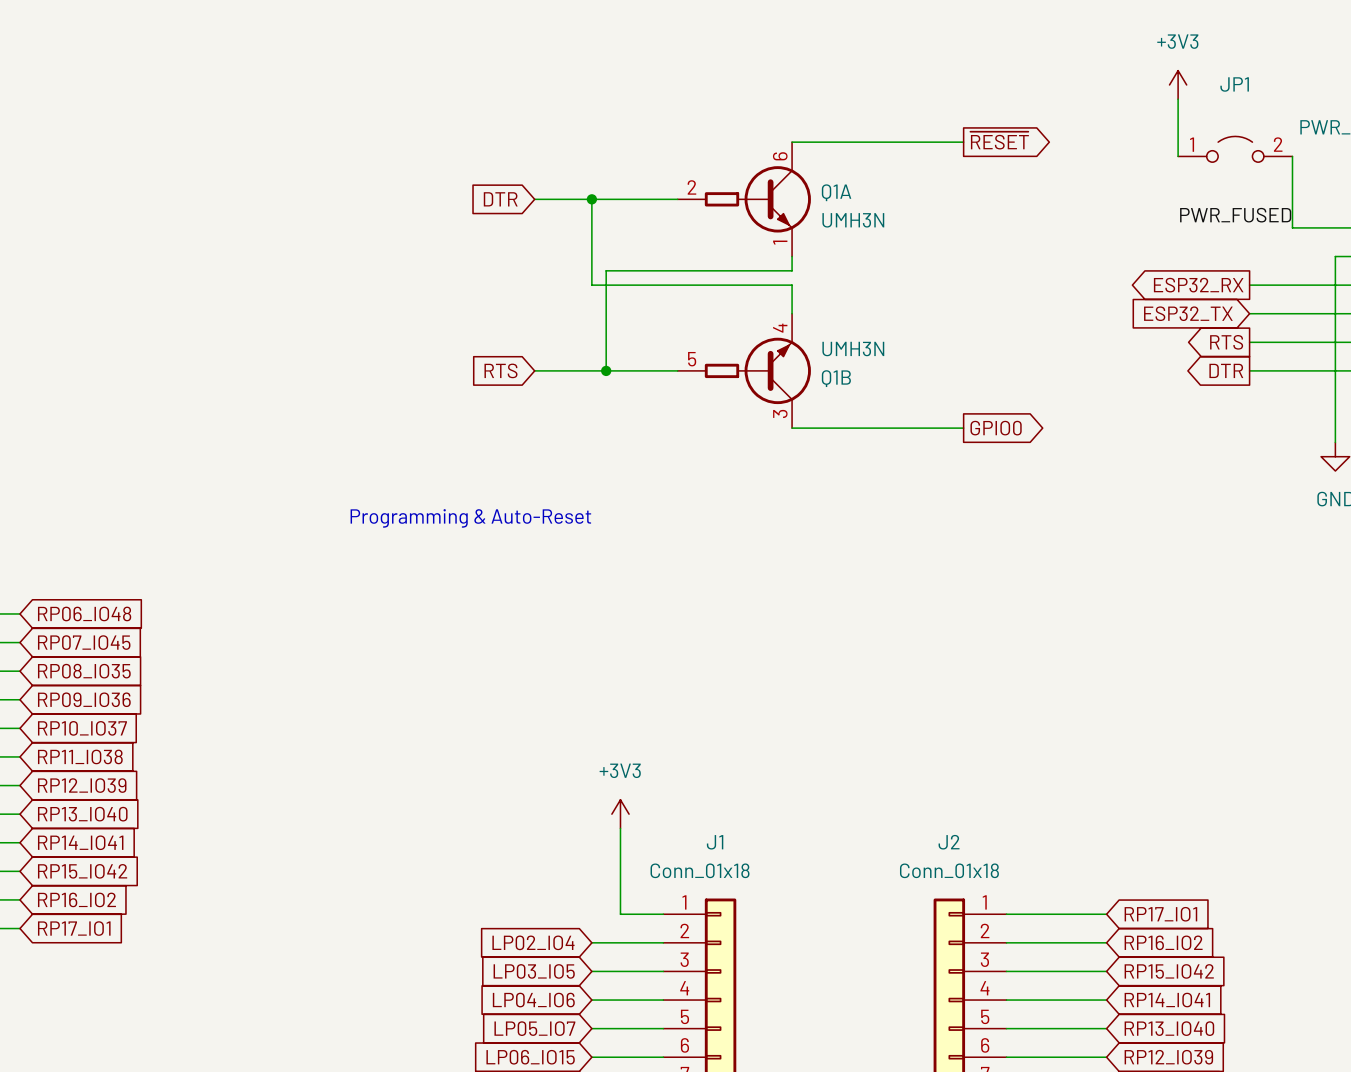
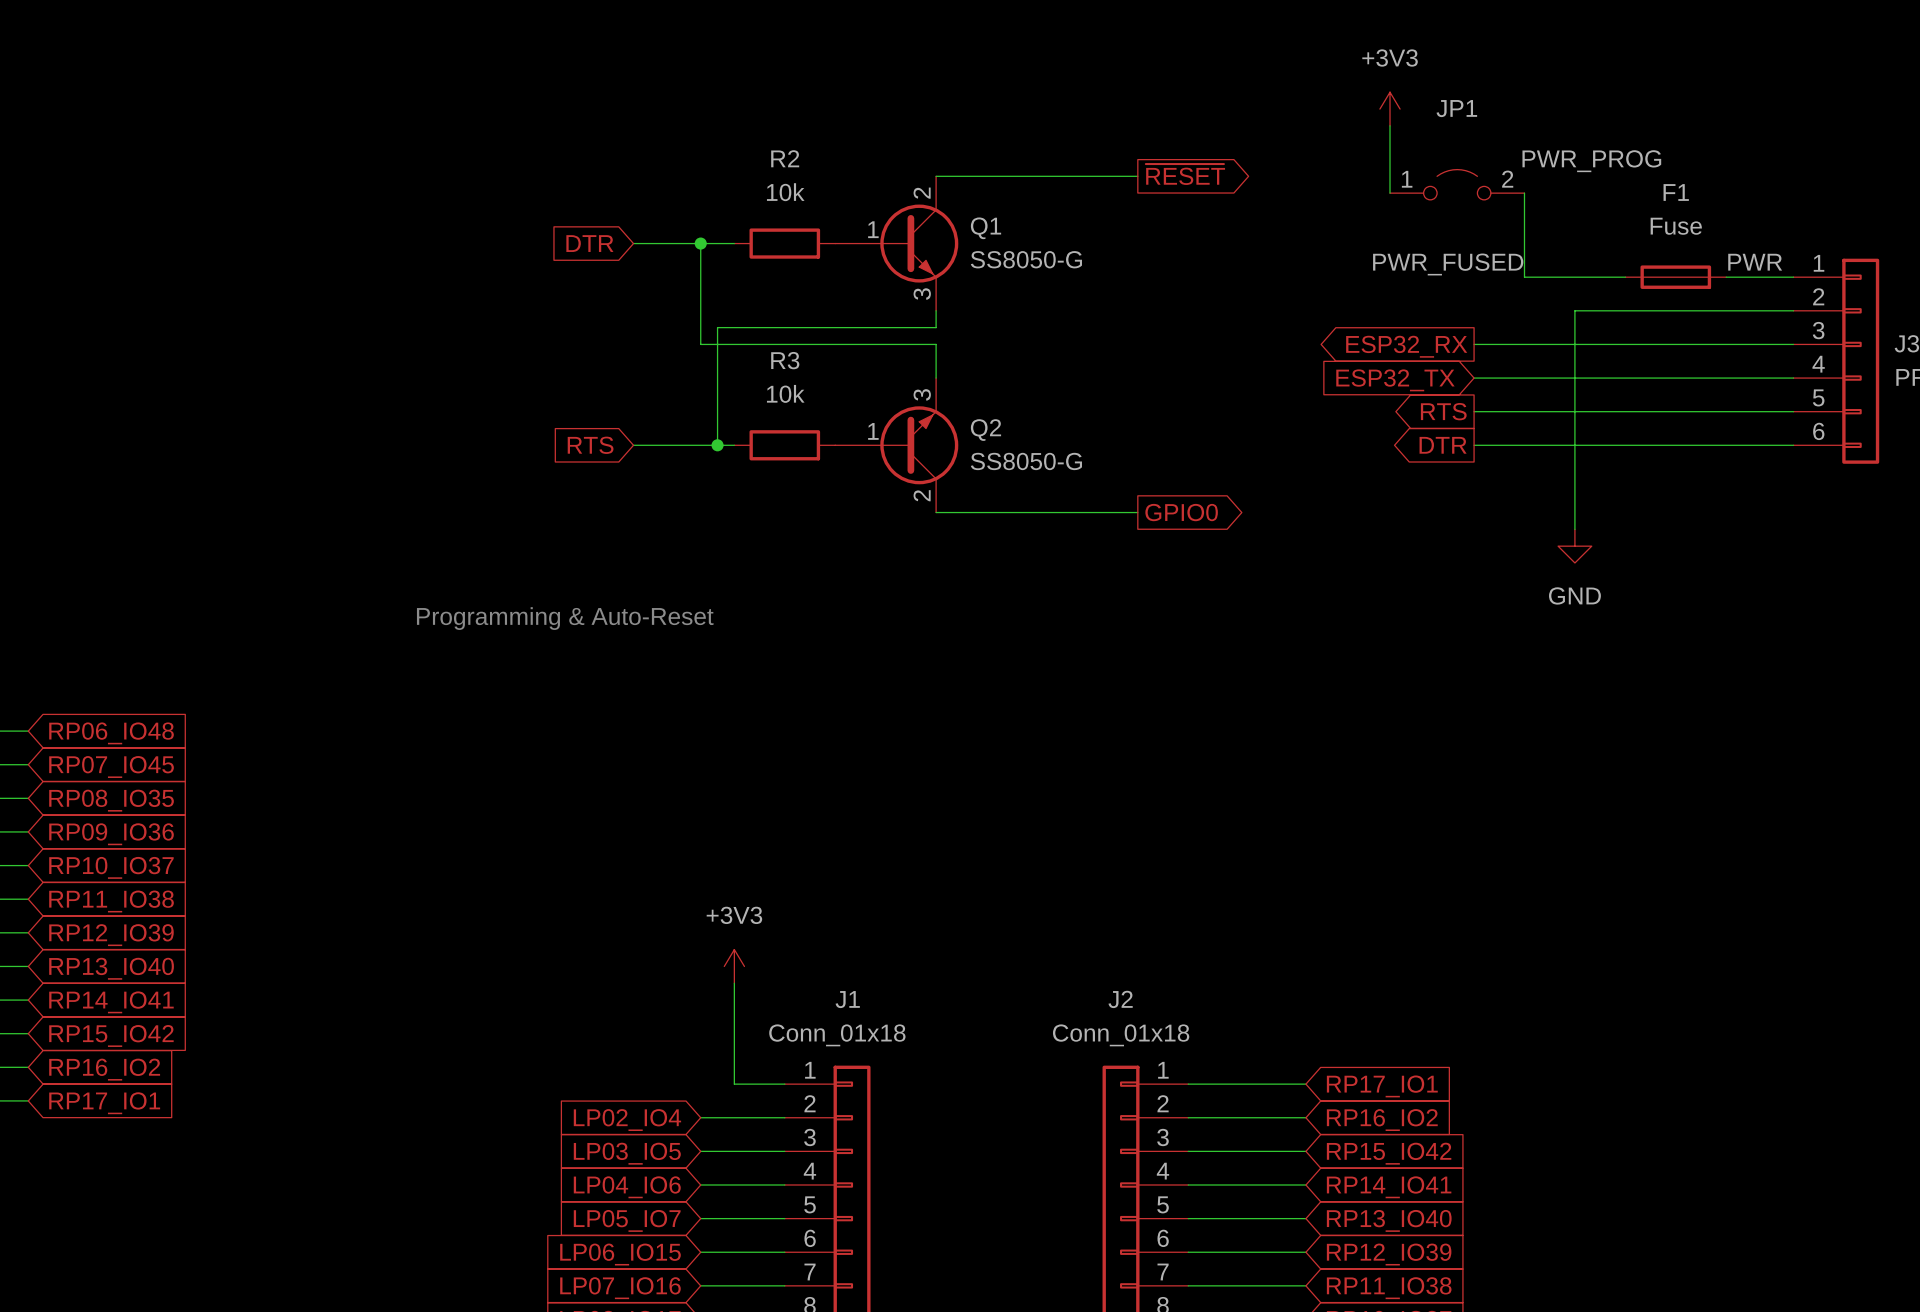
wire: (620, 199) (677, 199) -> none
R2: none -> 10k (784, 243)
Q1A: UMH3N (744, 199) -> none
Q1: none -> SS8050-G (896, 243)
wire: (620, 370) (677, 370) -> none
R3: none -> 10k (784, 445)
Q1B: UMH3N (744, 370) -> none
Q2: none -> SS8050-G (896, 445)

